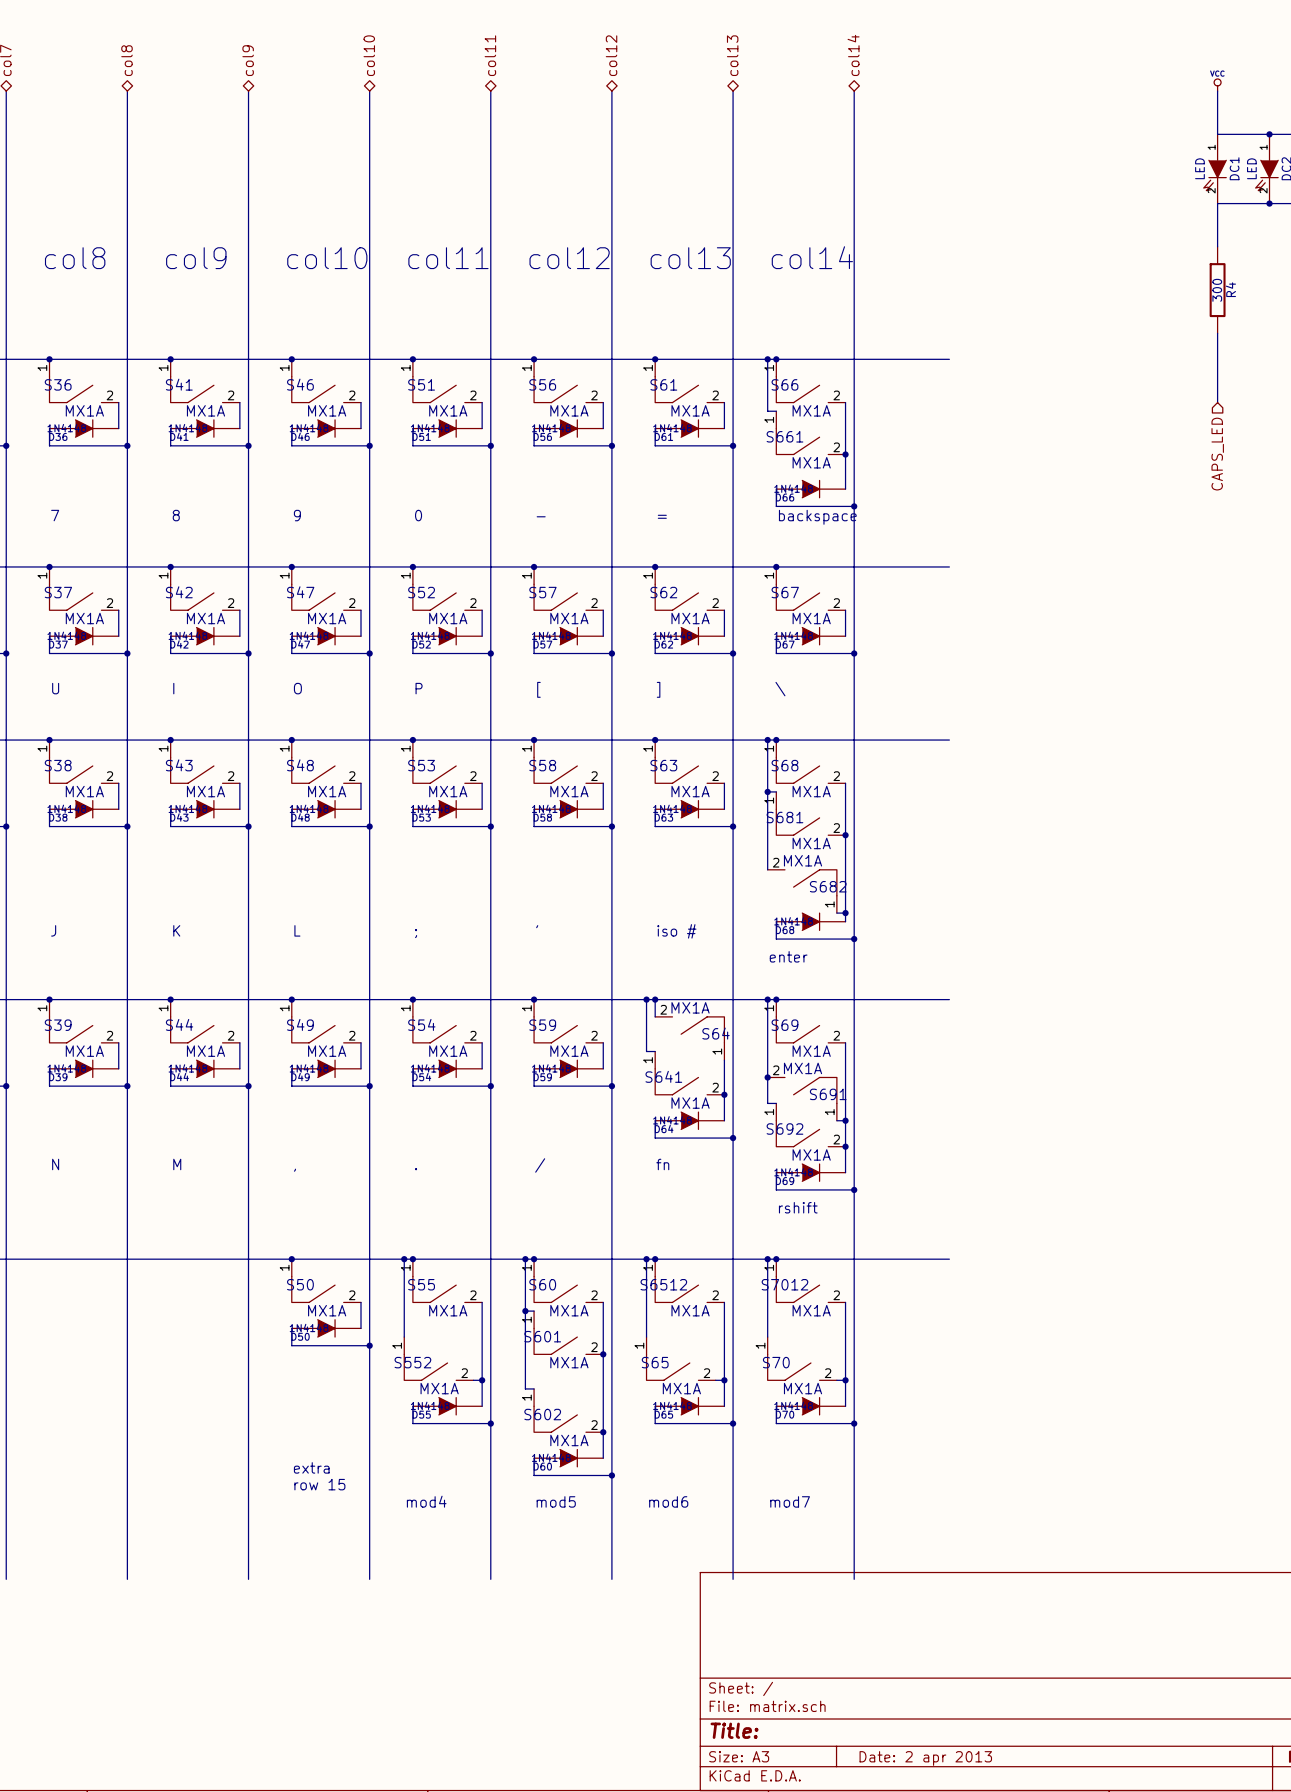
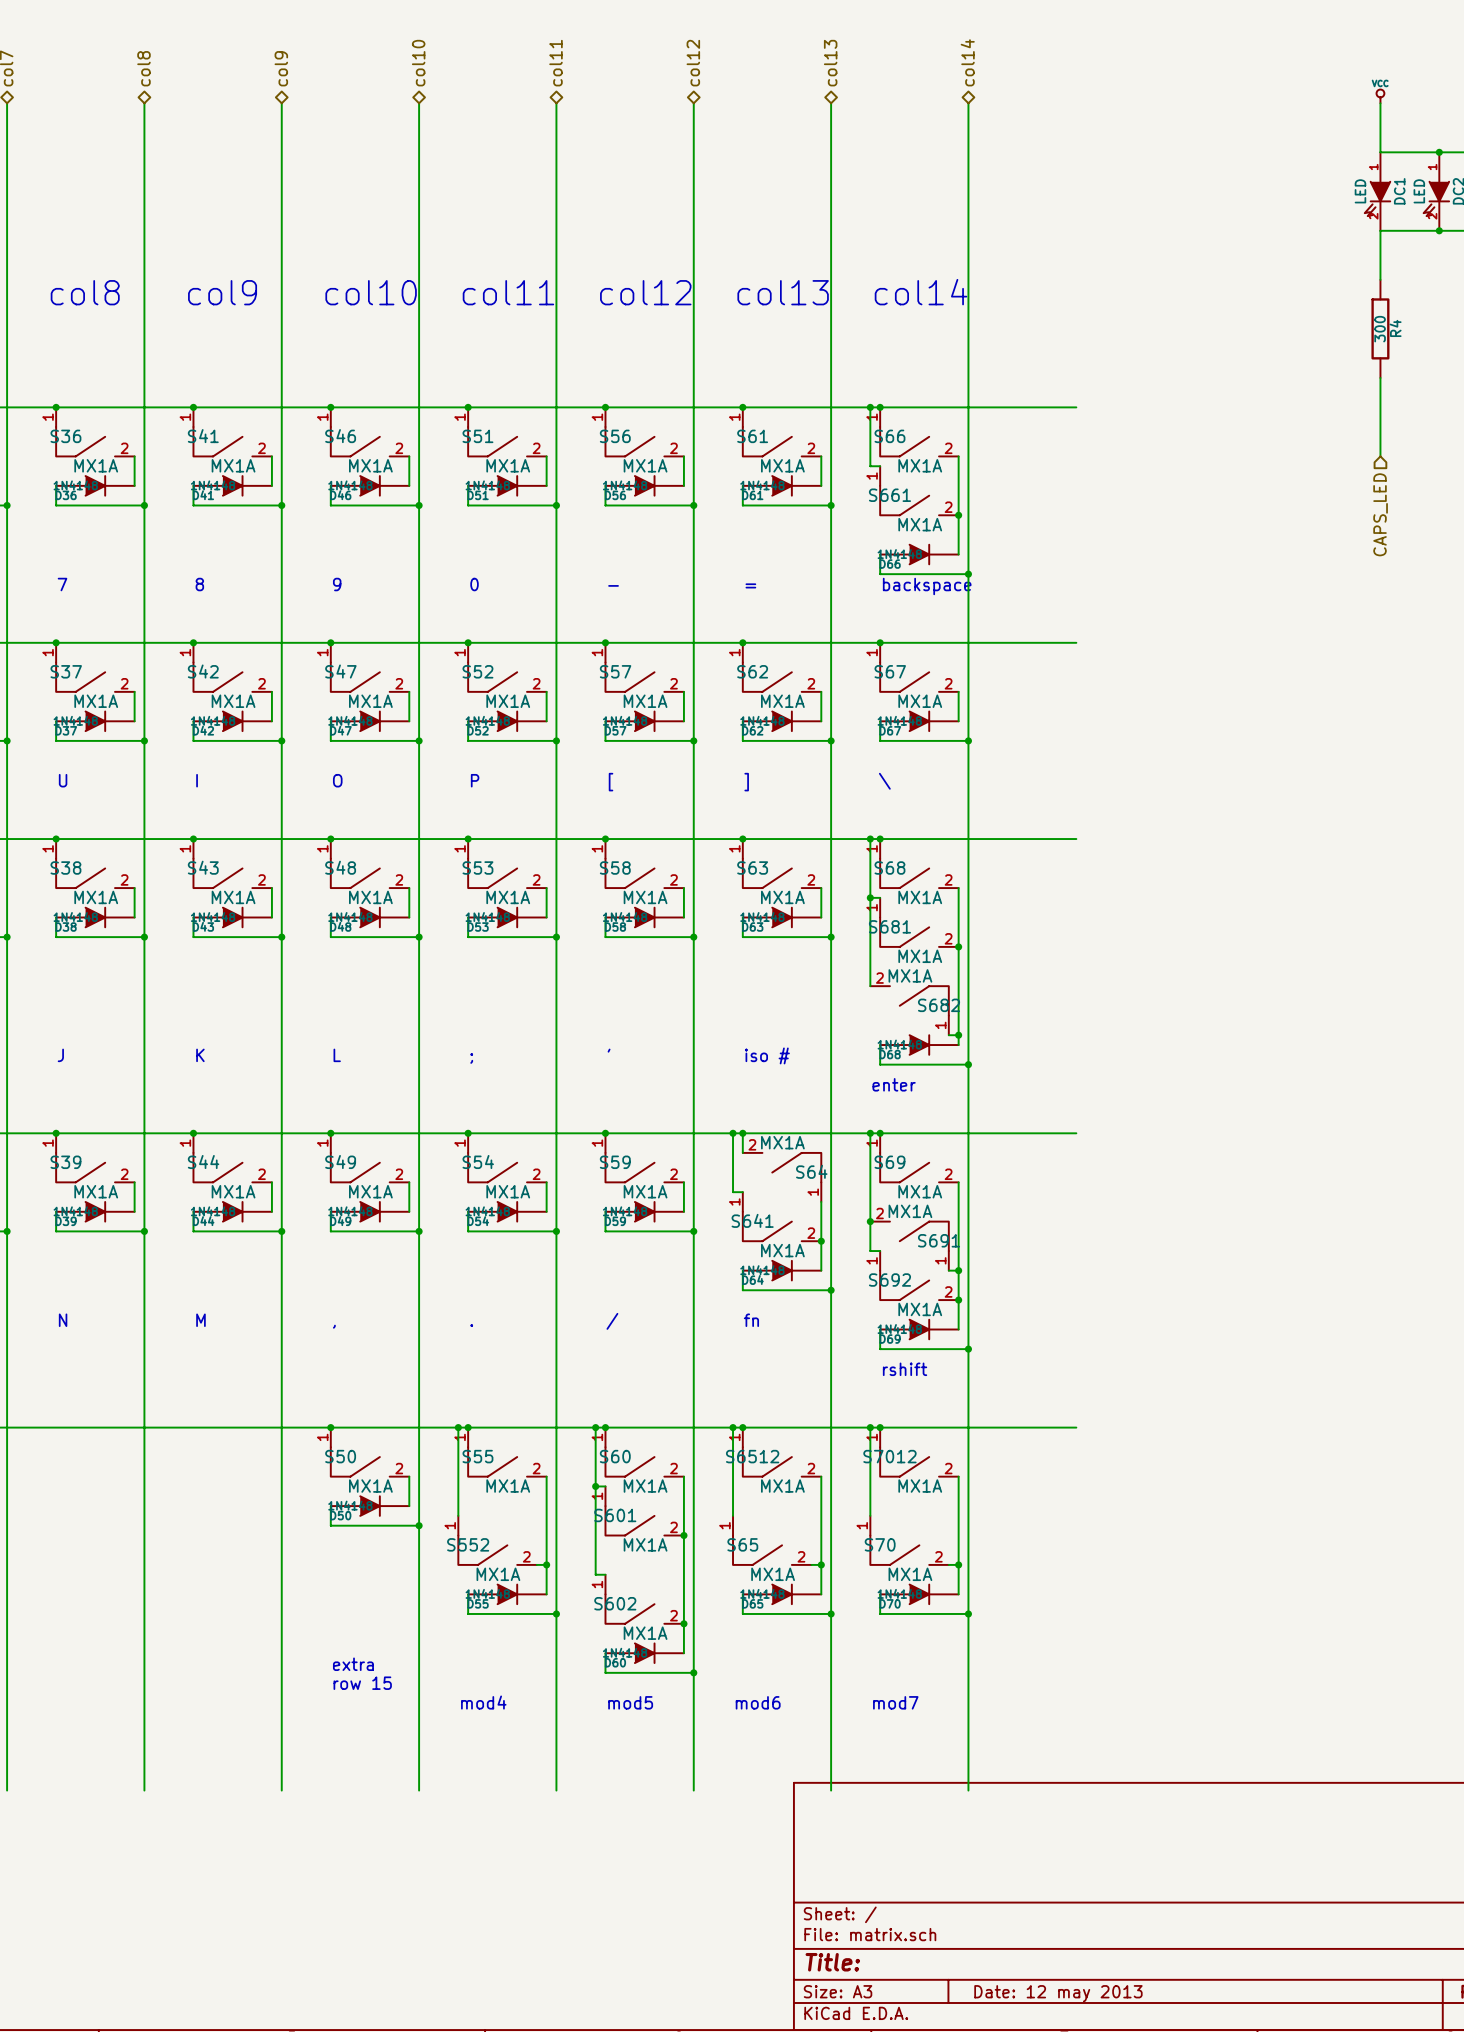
title block: Date: 2 apr 2013 (925, 1758) -> Date: 12 may 2013 (1058, 1993)

